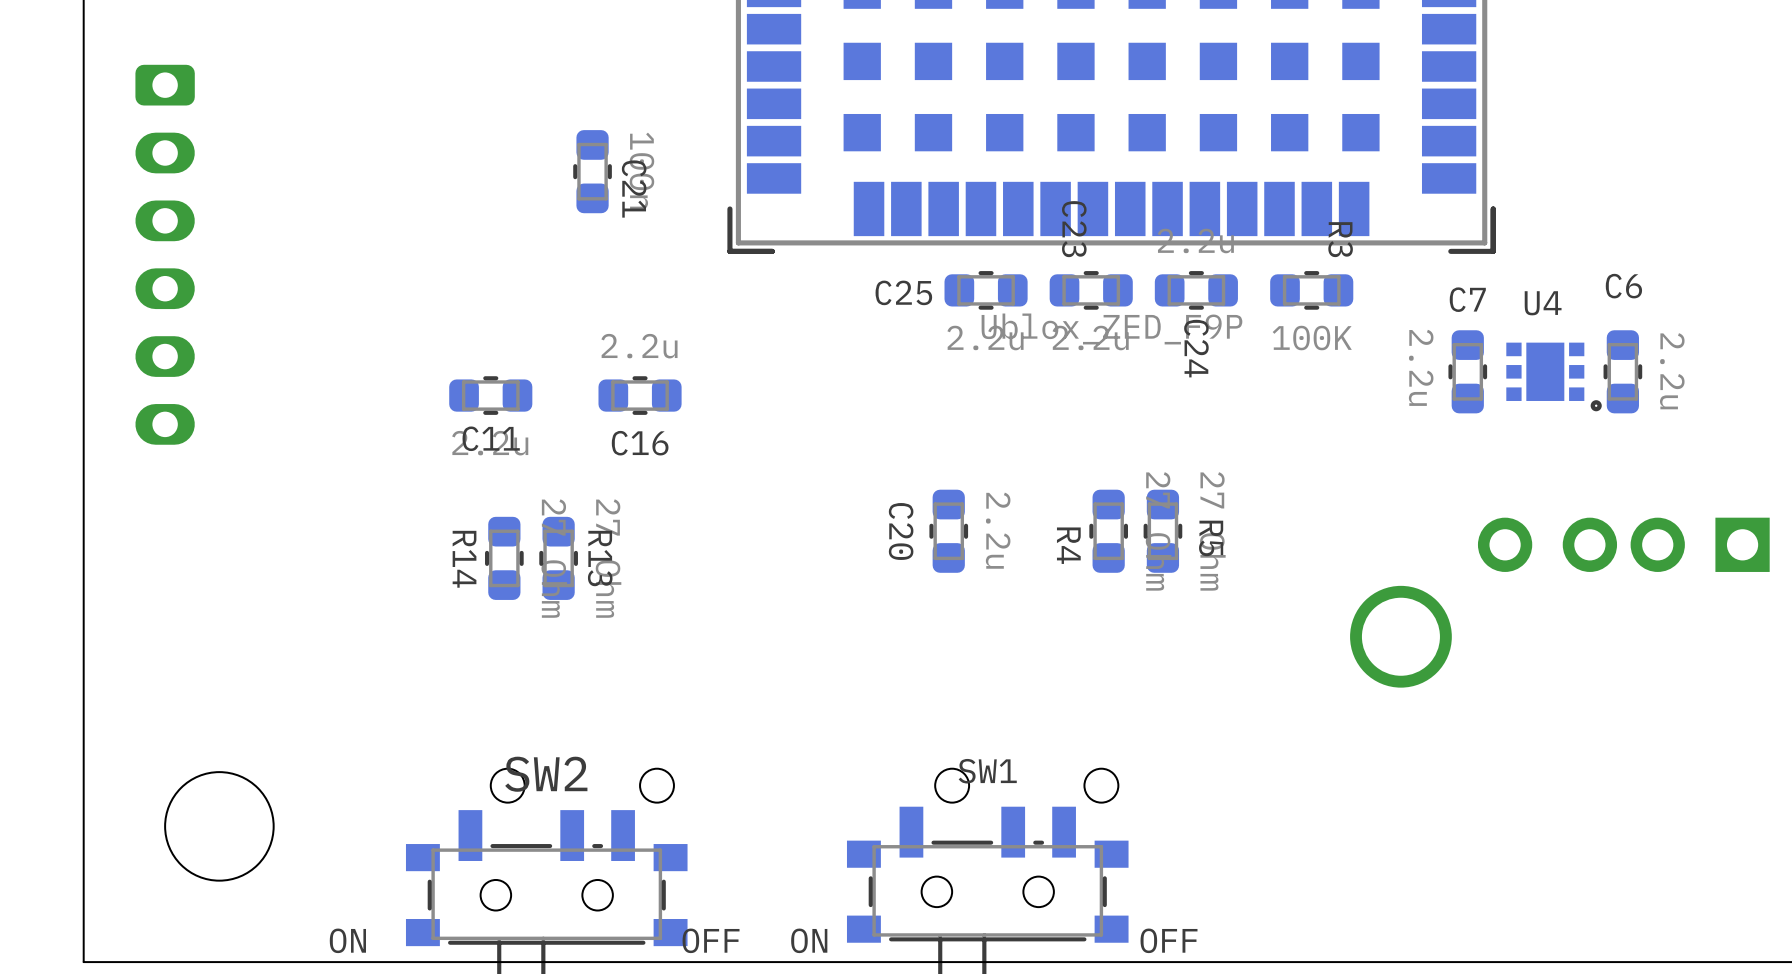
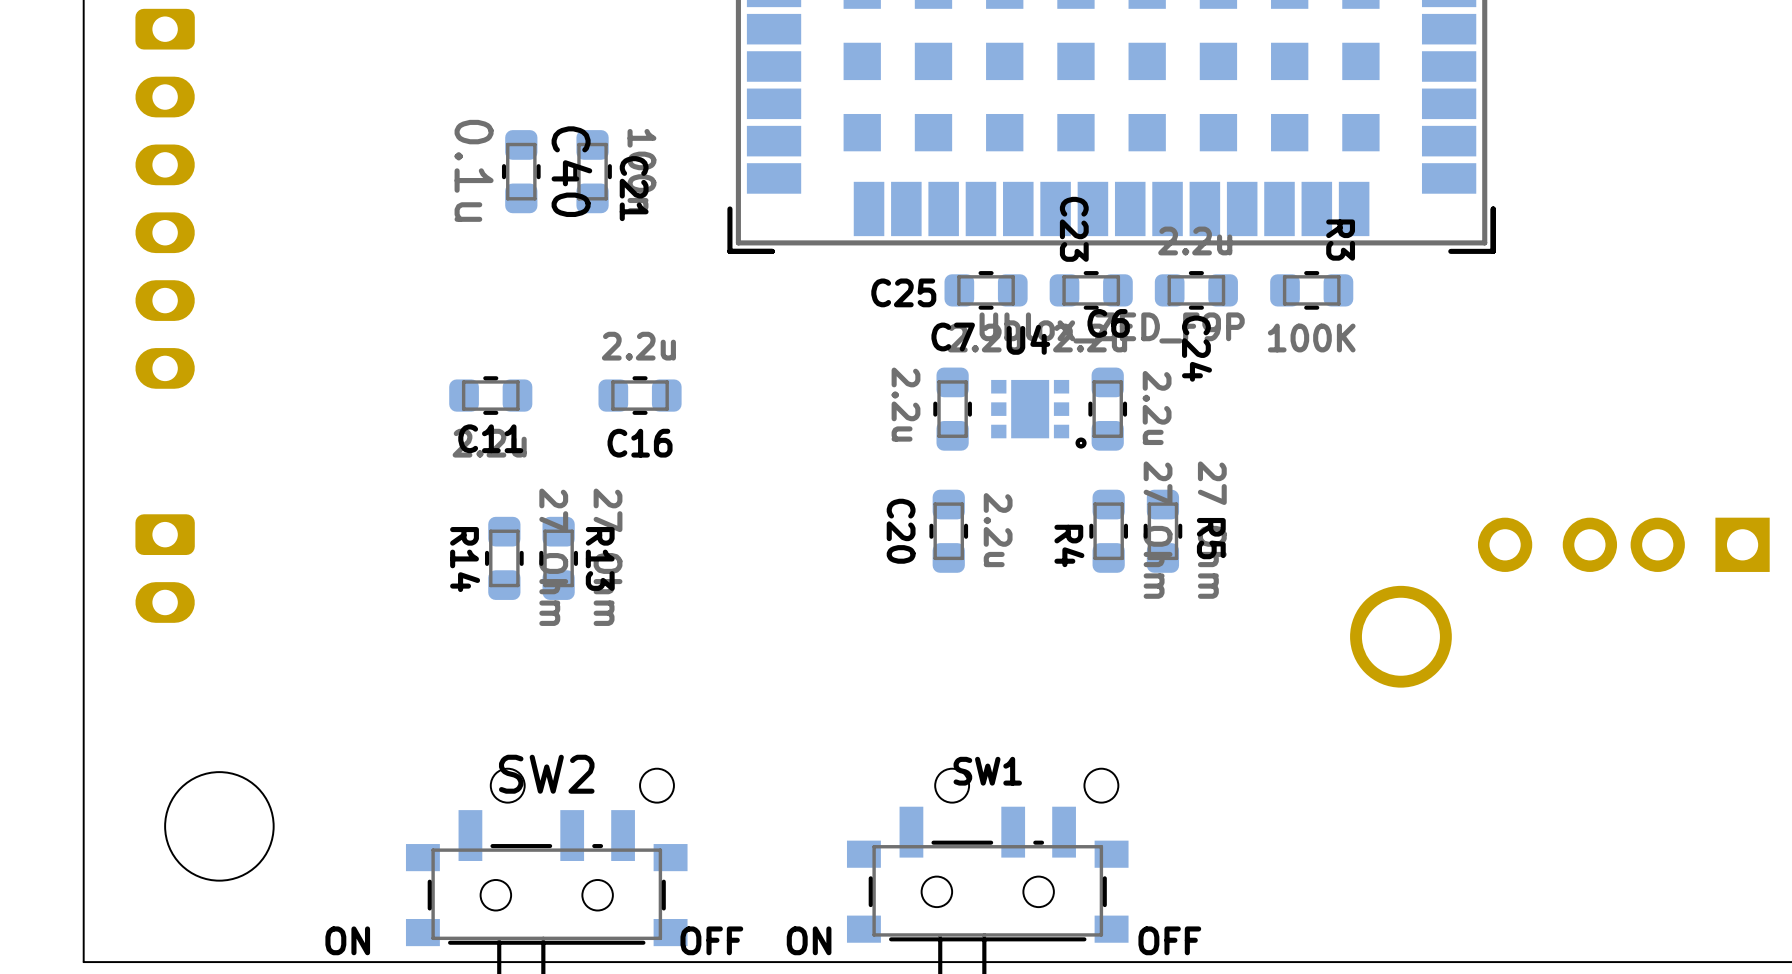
C40: none -> 0.1u (521, 171)
part position: (165, 254) -> (165, 198)
C7 position: (1467, 371) -> (952, 409)
C6 position: (1622, 371) -> (1107, 409)
U4 position: (1554, 376) -> (1038, 414)
part: none -> (165, 568)

